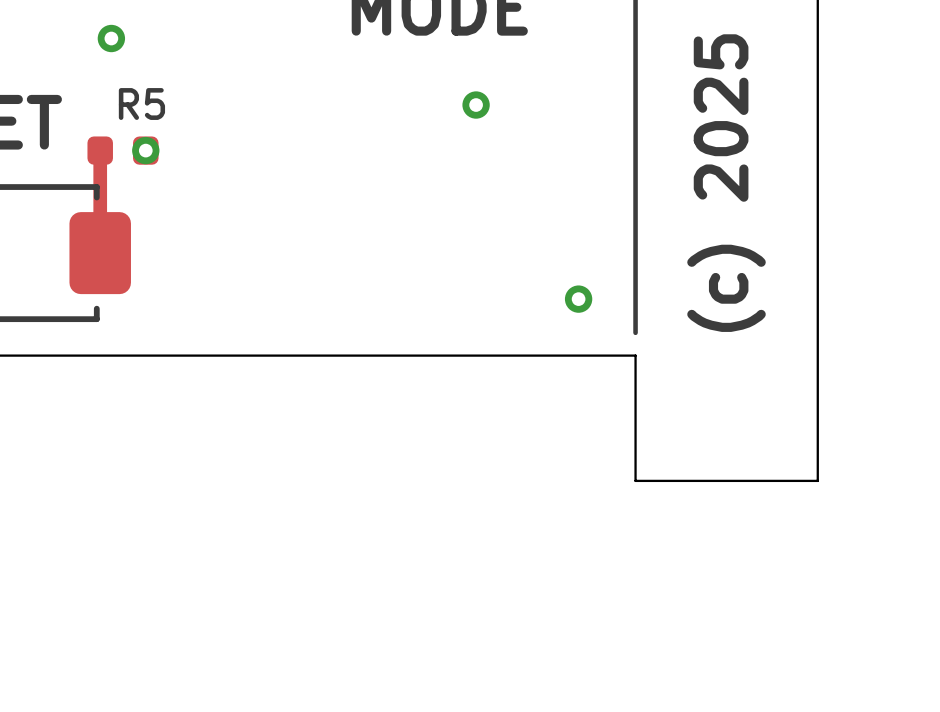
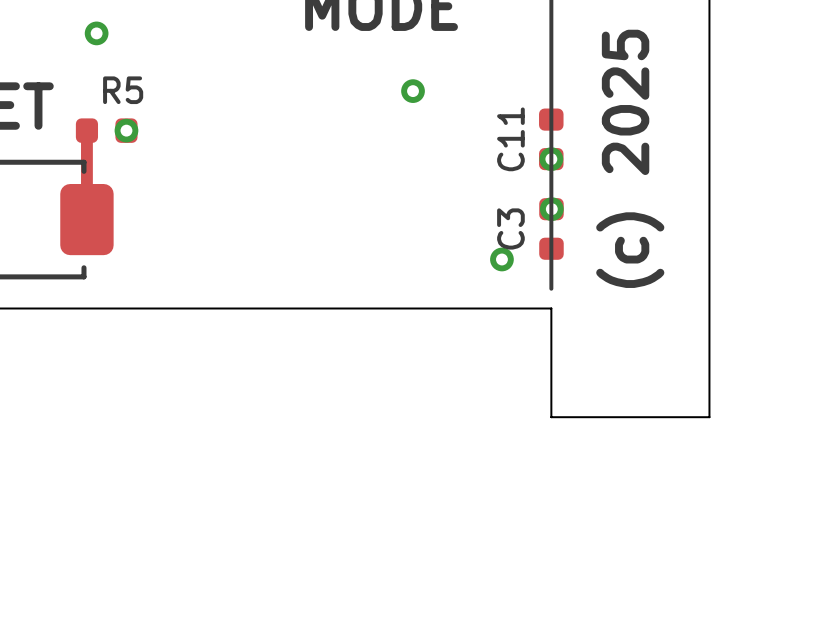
C11: none -> (551, 139)
via: none -> (551, 159)
via: none -> (551, 209)
C3: none -> (551, 228)

